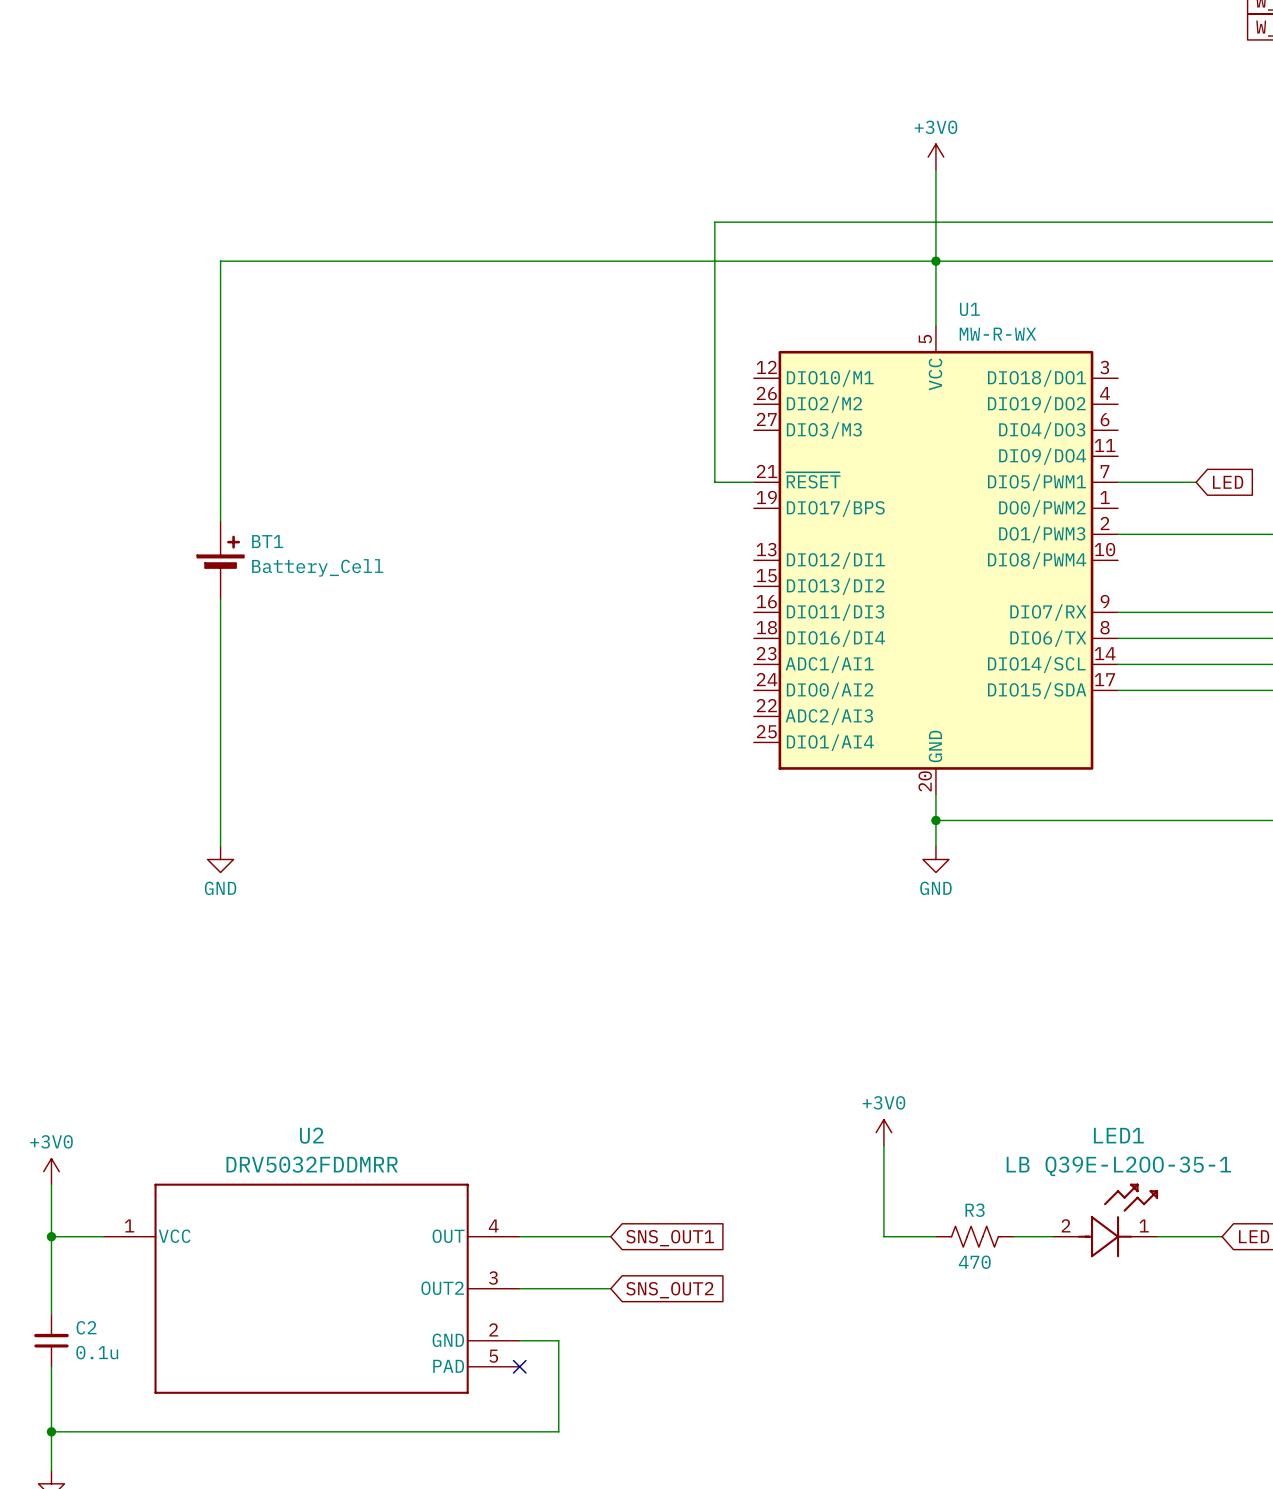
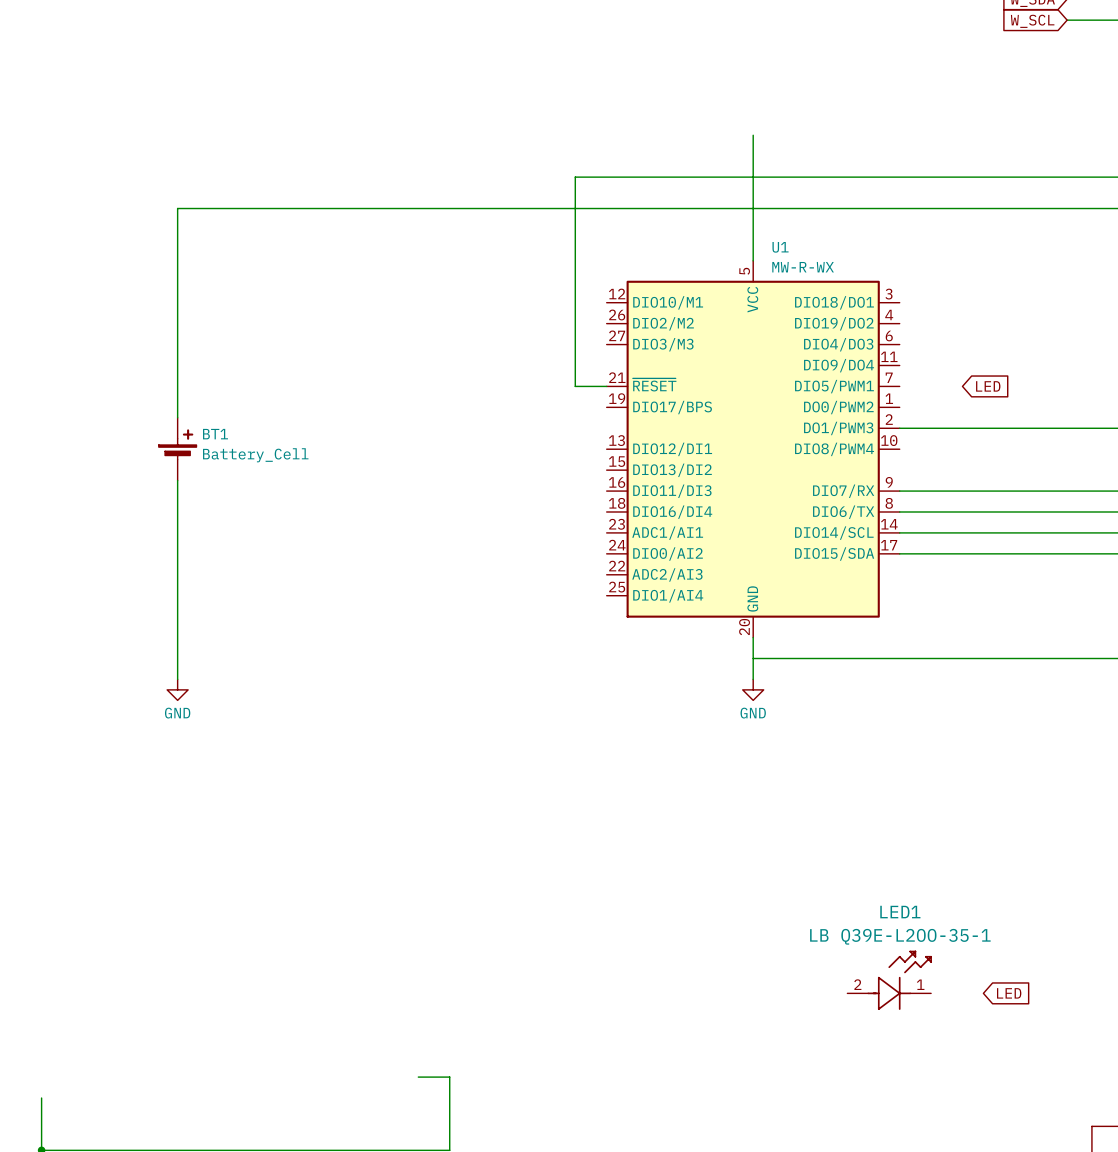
power symbol: +3V0 (935, 157) -> none
junction: (935, 261) -> none
wire: (1118, 482) (1196, 482) -> none
junction: (935, 820) -> none
power symbol: +3V0 (883, 1132) -> none
wire: (883, 1145) (883, 1236) (935, 1236) -> none
power symbol: +3V0 (51, 1171) -> none
wire: (51, 1184) (51, 1314) -> none
wire: (51, 1236) (103, 1236) -> none
junction: (51, 1236) -> none
wire: (519, 1236) (610, 1236) -> none
R3: 470 (974, 1236) -> none
wire: (1014, 1236) (1053, 1236) -> none
wire: (1157, 1236) (1222, 1236) -> none
global label: SNS_OUT1 (670, 1238) -> none
U2: DRV5032FDDMRR (311, 1288) -> none
wire: (519, 1288) (610, 1288) -> none
global label: SNS_OUT2 (669, 1290) -> none
C2: 0.1u (51, 1340) -> none
no-connect mark: (519, 1366) -> none

